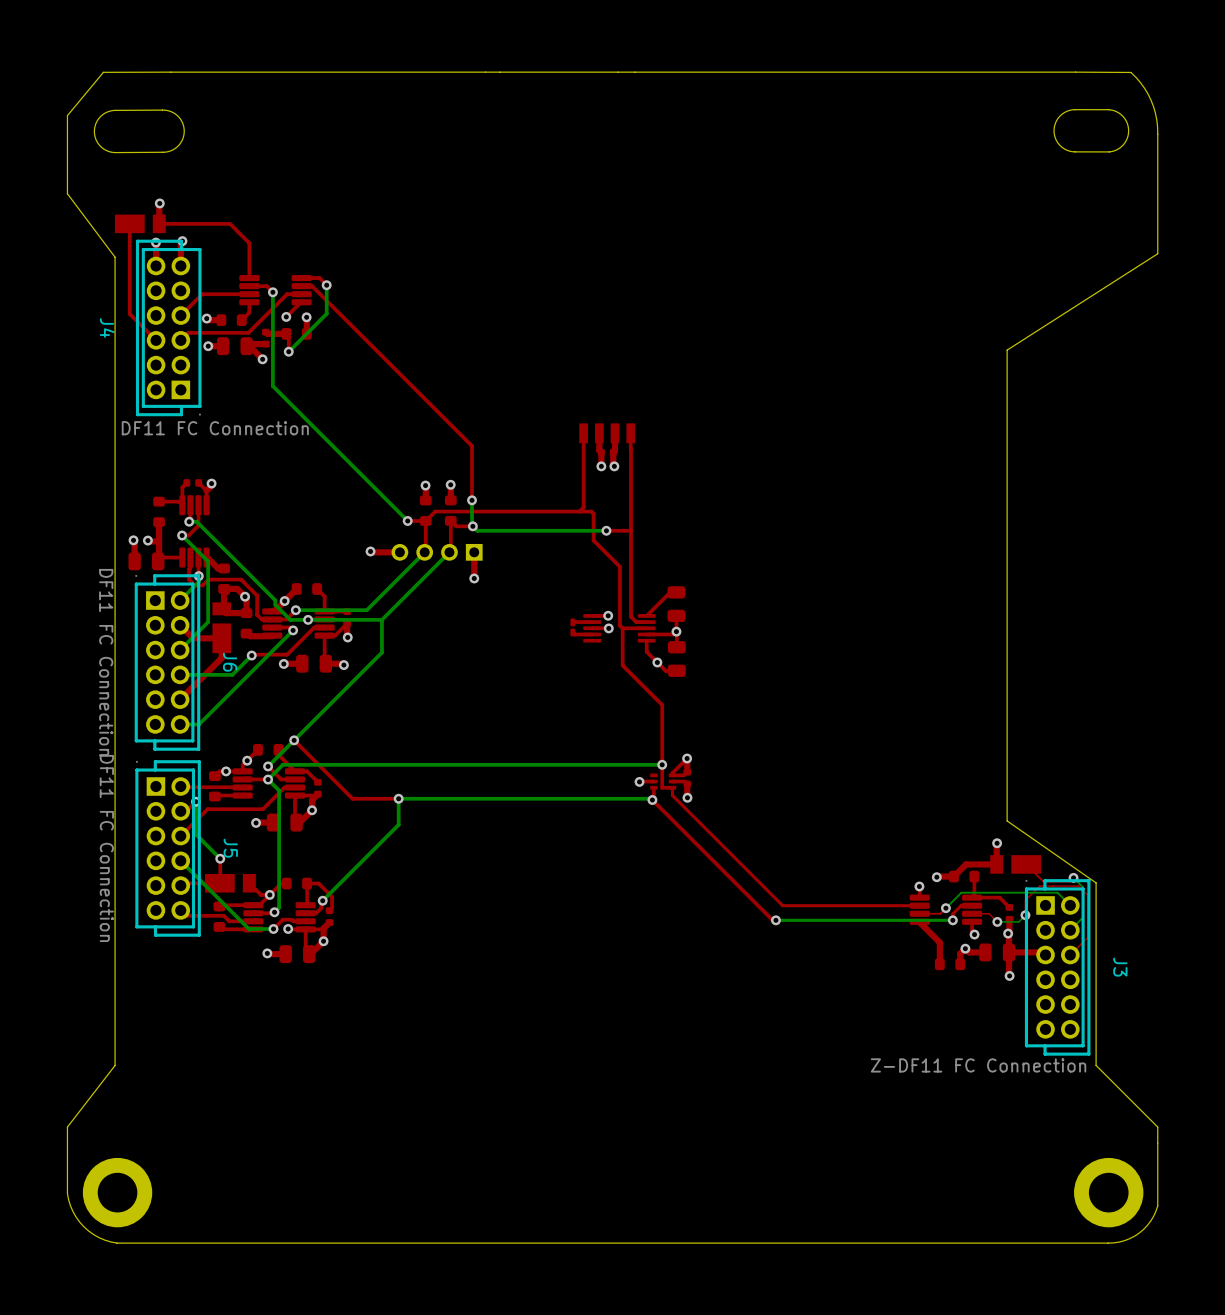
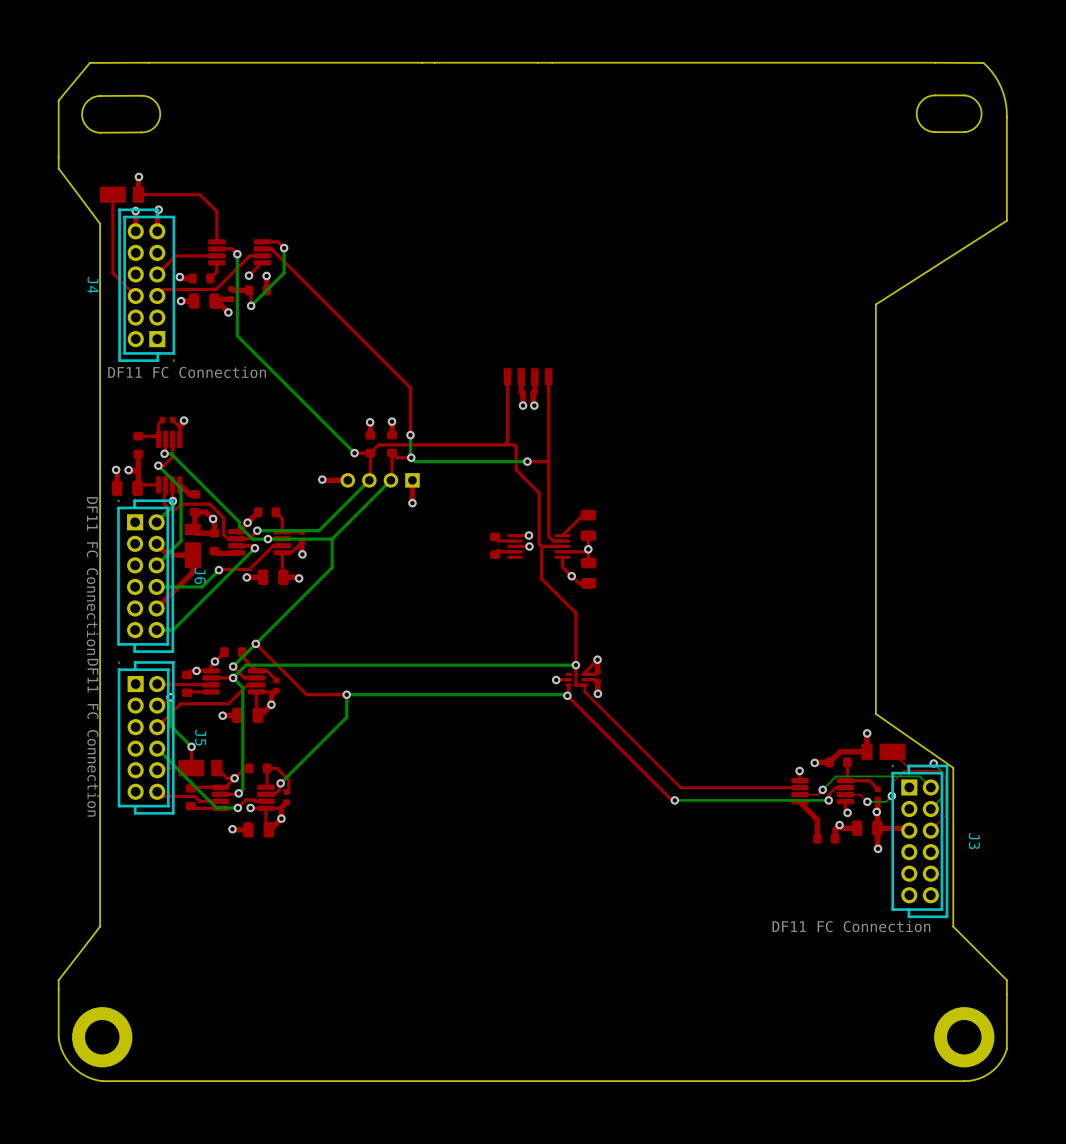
part footprint: [570, 618, 576, 637] -> [489, 532, 501, 559]
J3 value: Z-DF11 FC Connection (978, 1065) -> DF11 FC Connection (851, 926)

